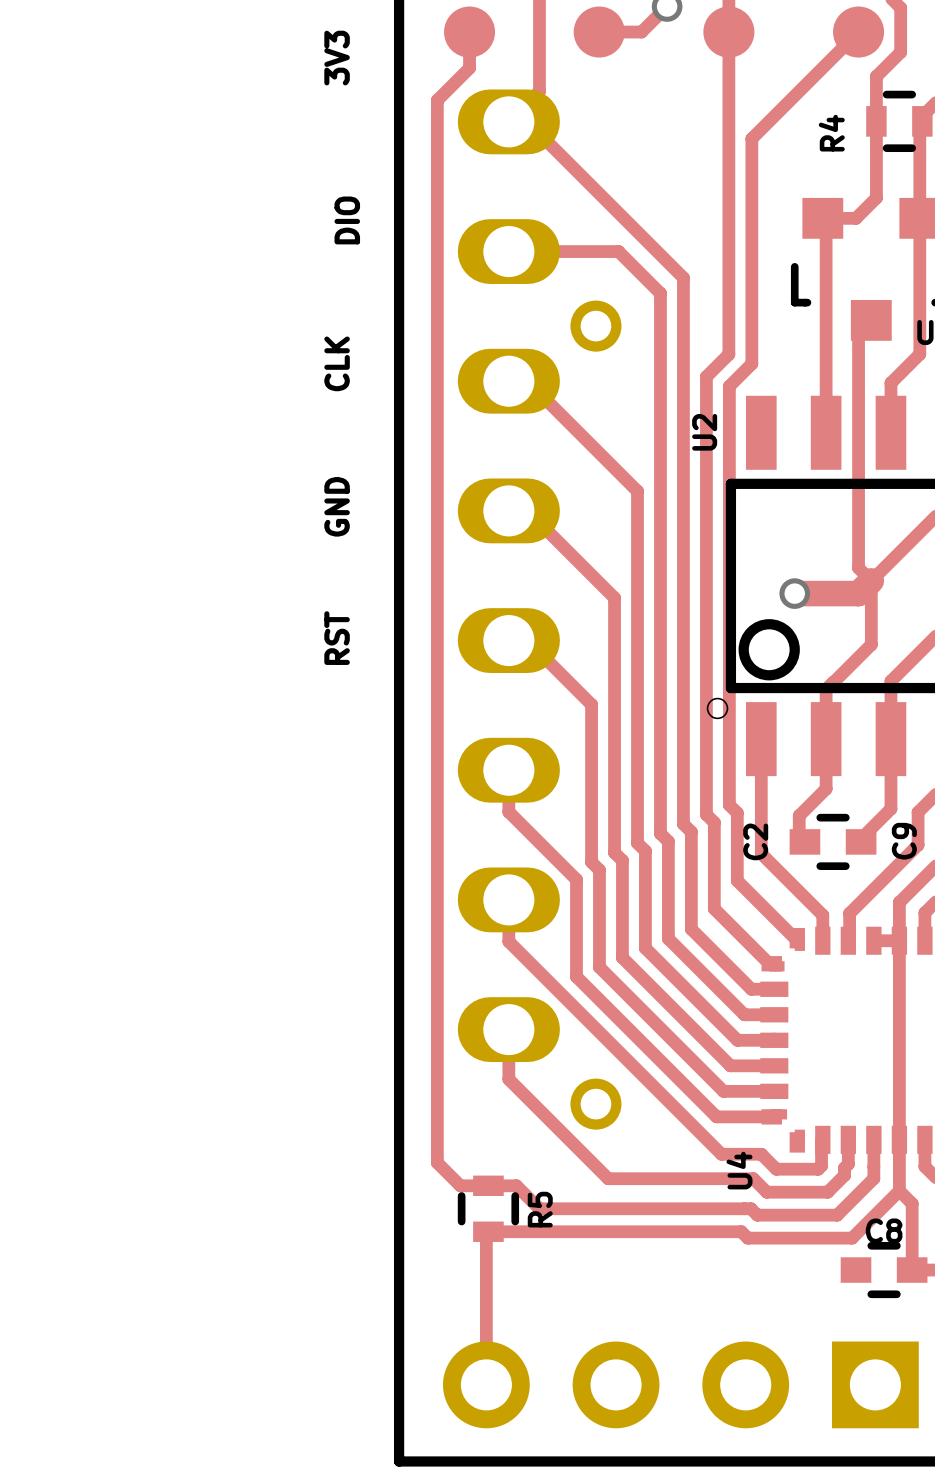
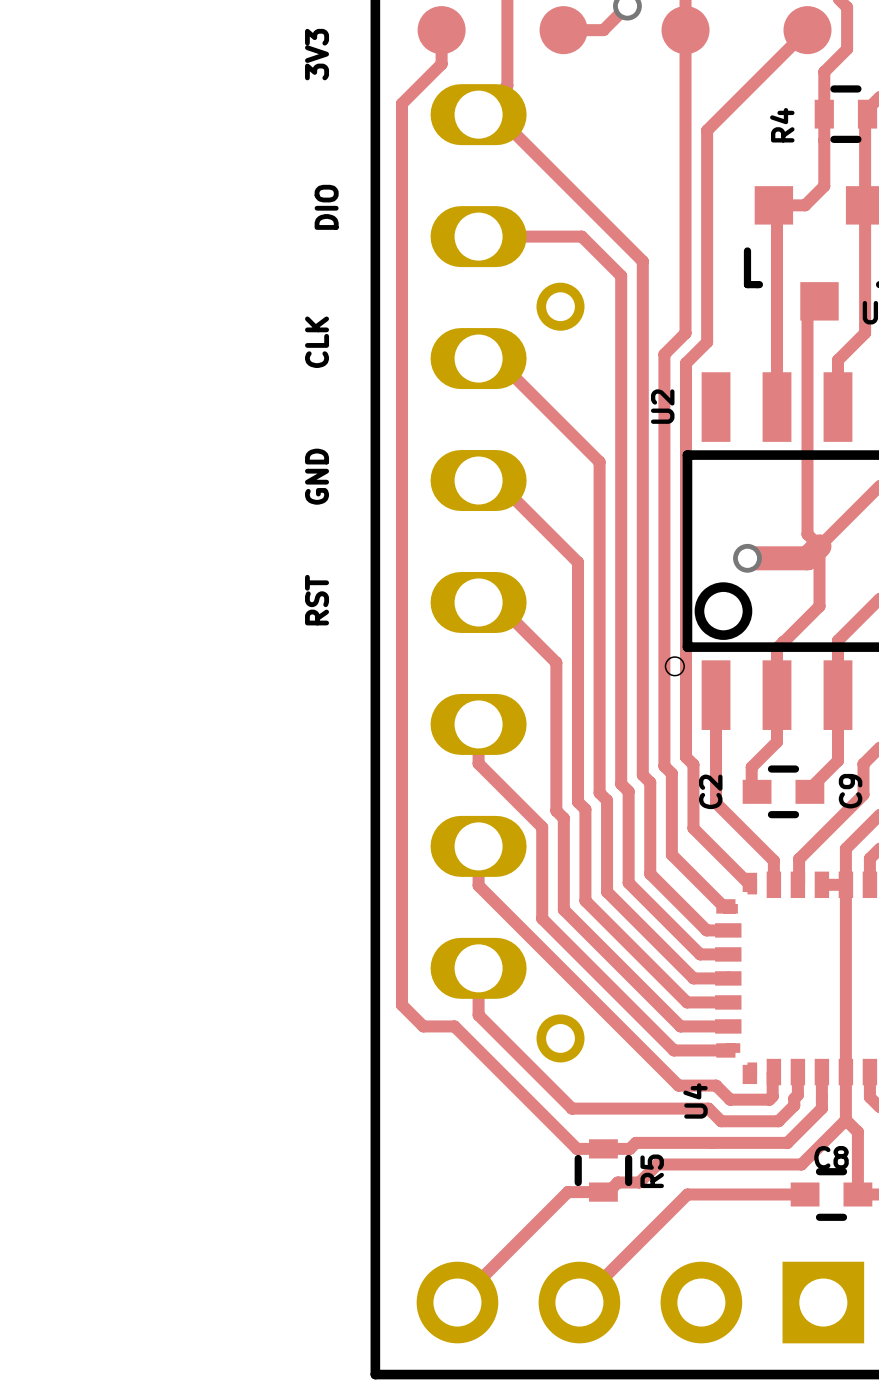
track: (437, 100) (437, 1162) (460, 1185) (516, 1185) (539, 1208) (750, 1208) (757, 1215) -> (411, 94) (401, 103) (401, 1005) (423, 1026) (454, 1026) (577, 1148) (629, 1148) (635, 1142) (712, 1142)
R5 position: (488, 1208) -> (603, 1170)
track: (747, 1238) (741, 1231) (488, 1231) (486, 1233) (486, 1384) -> (703, 1164) (657, 1164) (639, 1182) (617, 1182) (608, 1192) (567, 1192) (457, 1302)
track: none -> (805, 1194) (687, 1194) (579, 1302)

